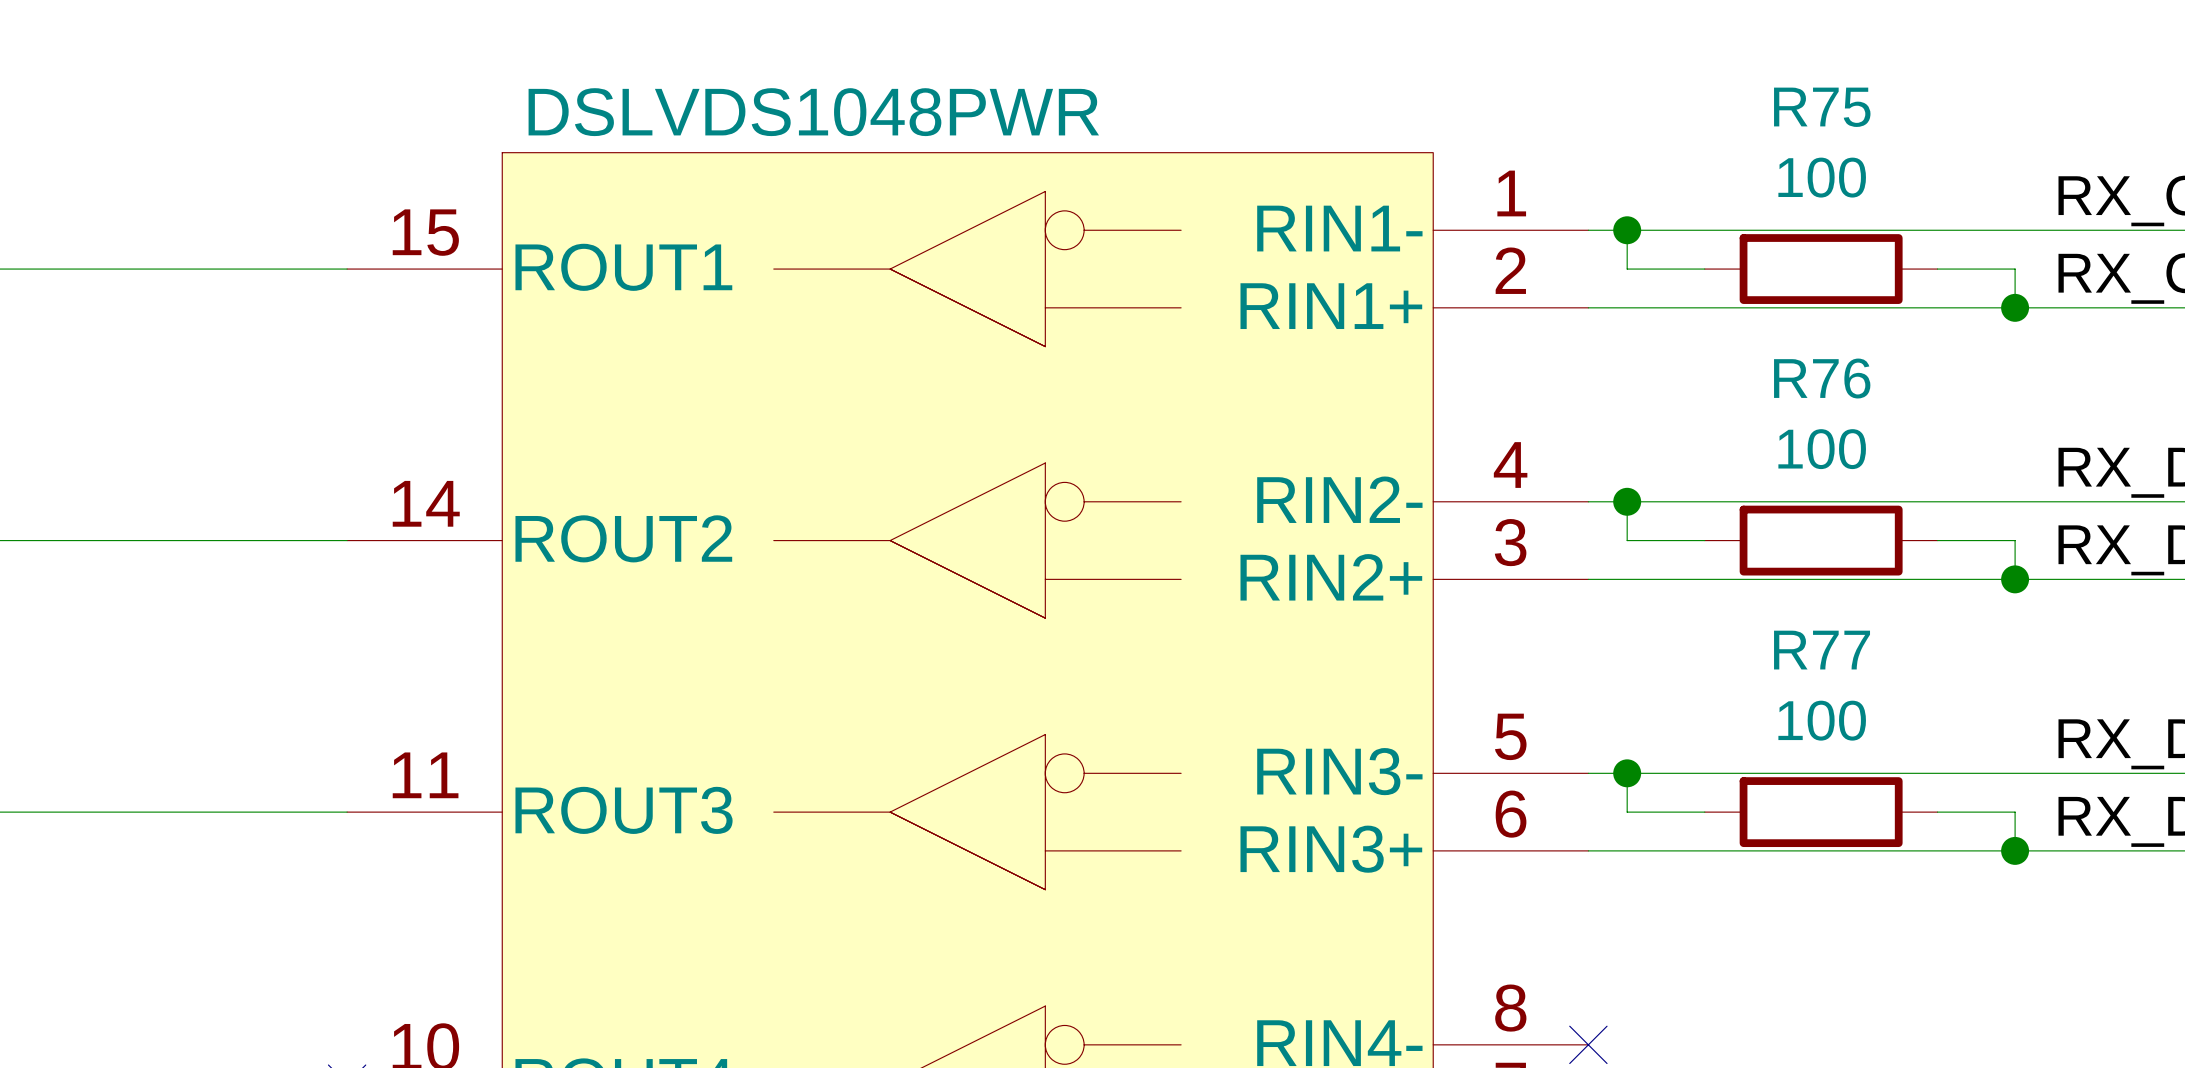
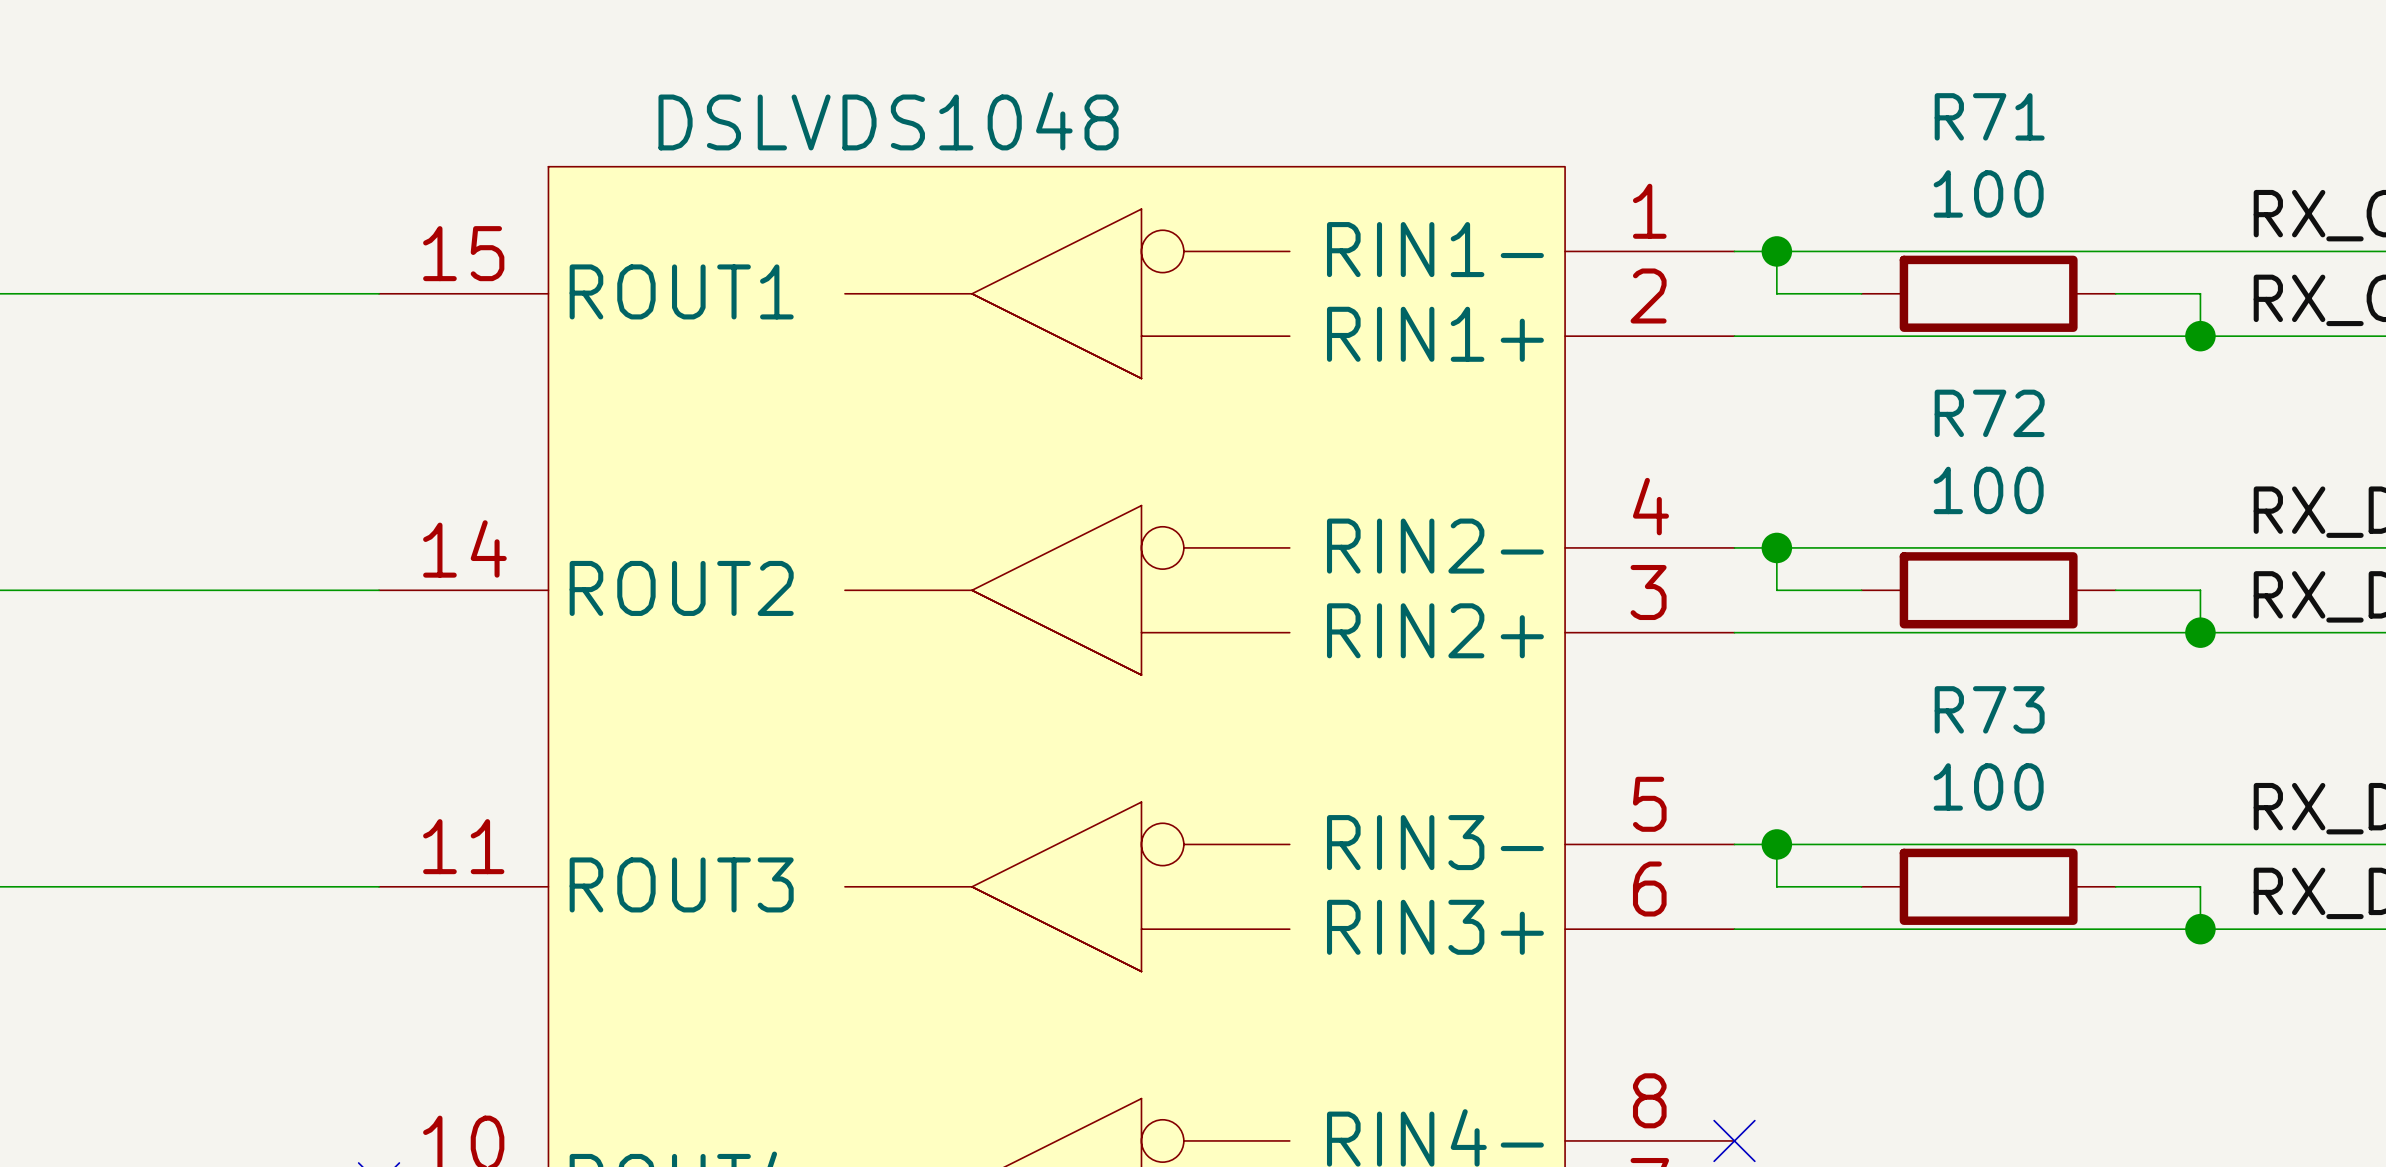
R75 name: R75 (1822, 107) -> R71 (1989, 116)
part value: DSLVDS1048PWR (813, 112) -> DSLVDS1048 (888, 121)
R76 name: R76 (1822, 378) -> R72 (1989, 413)
R77 name: R77 (1822, 650) -> R73 (1989, 709)

